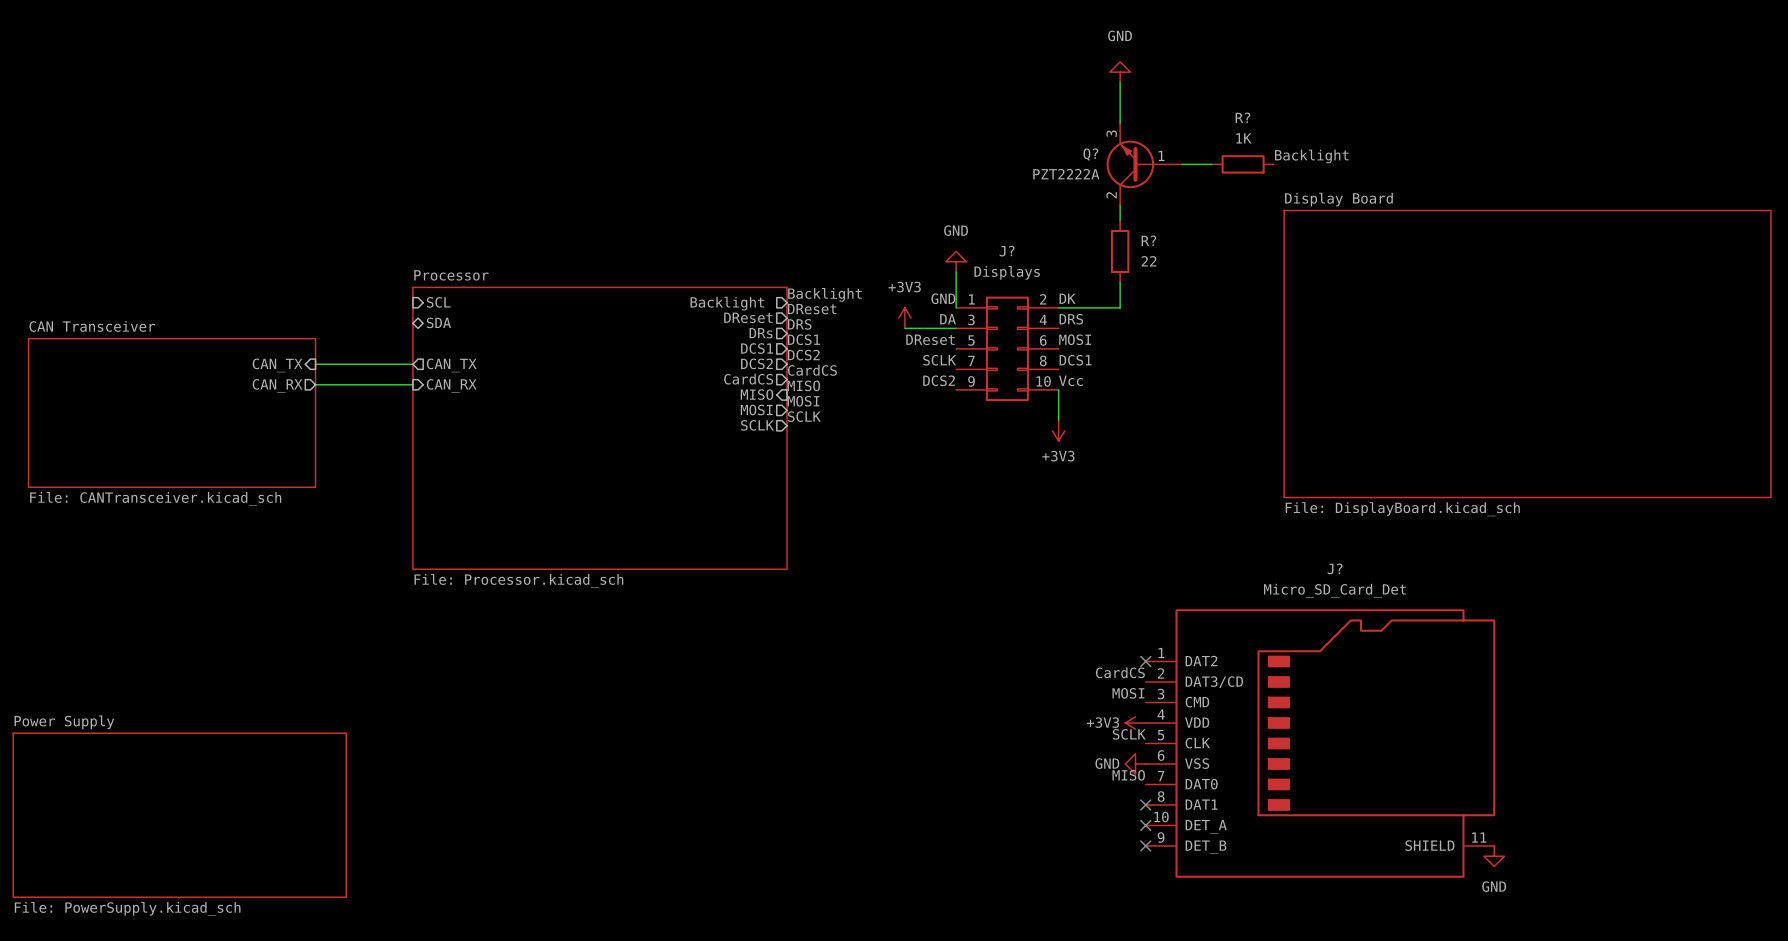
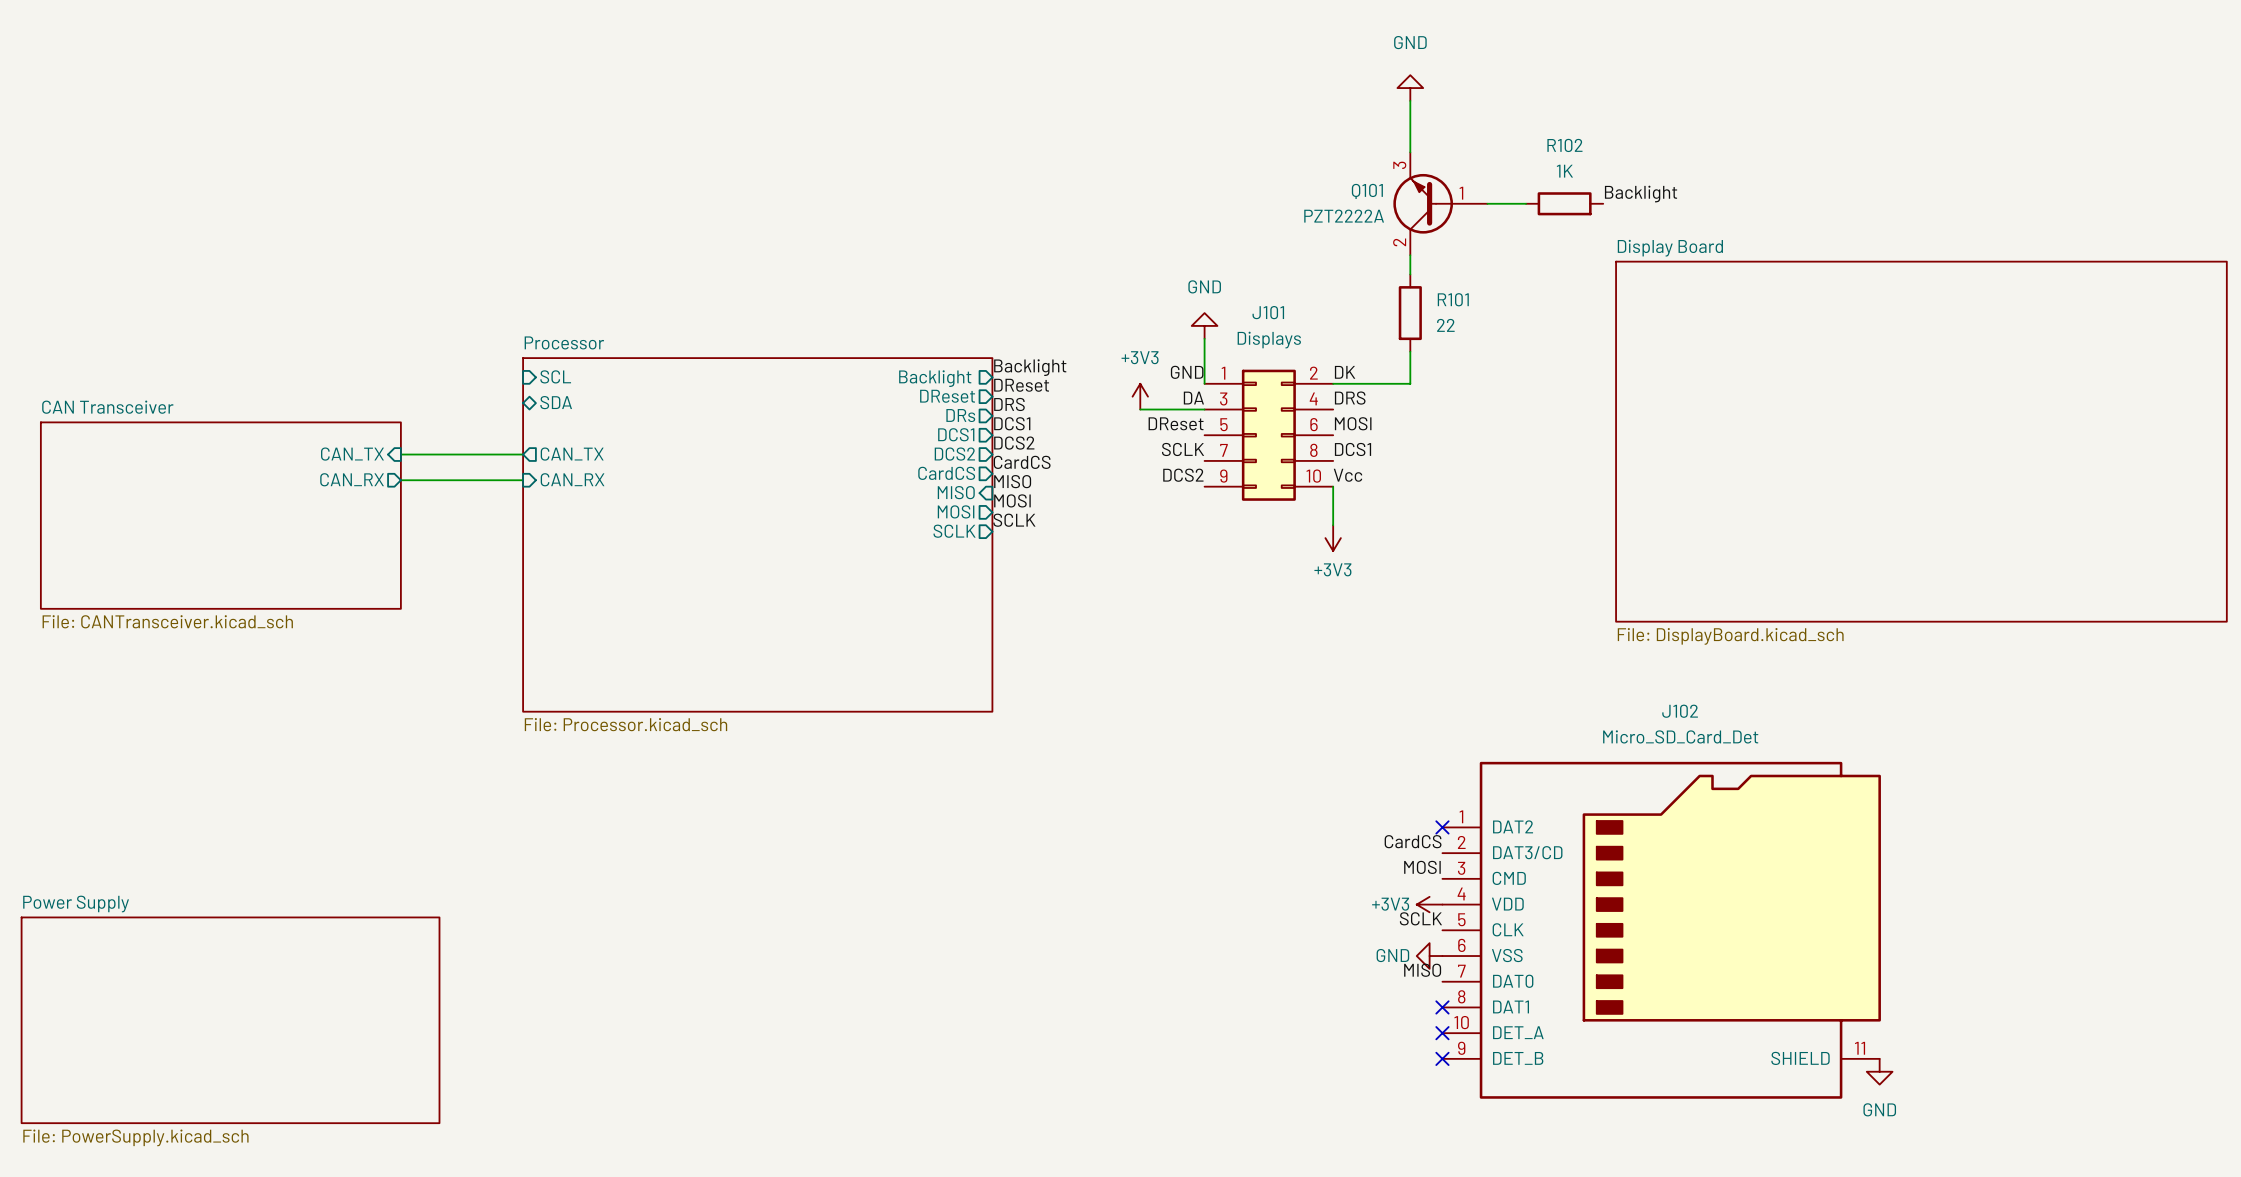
R? name: R? (1242, 117) -> R102 (1564, 145)
Q? name: Q? (1090, 154) -> Q101 (1367, 191)
R? name: R? (1148, 240) -> R101 (1453, 299)
J? name: J? (1007, 251) -> J101 (1268, 312)
J? name: J? (1335, 568) -> J102 (1680, 711)

